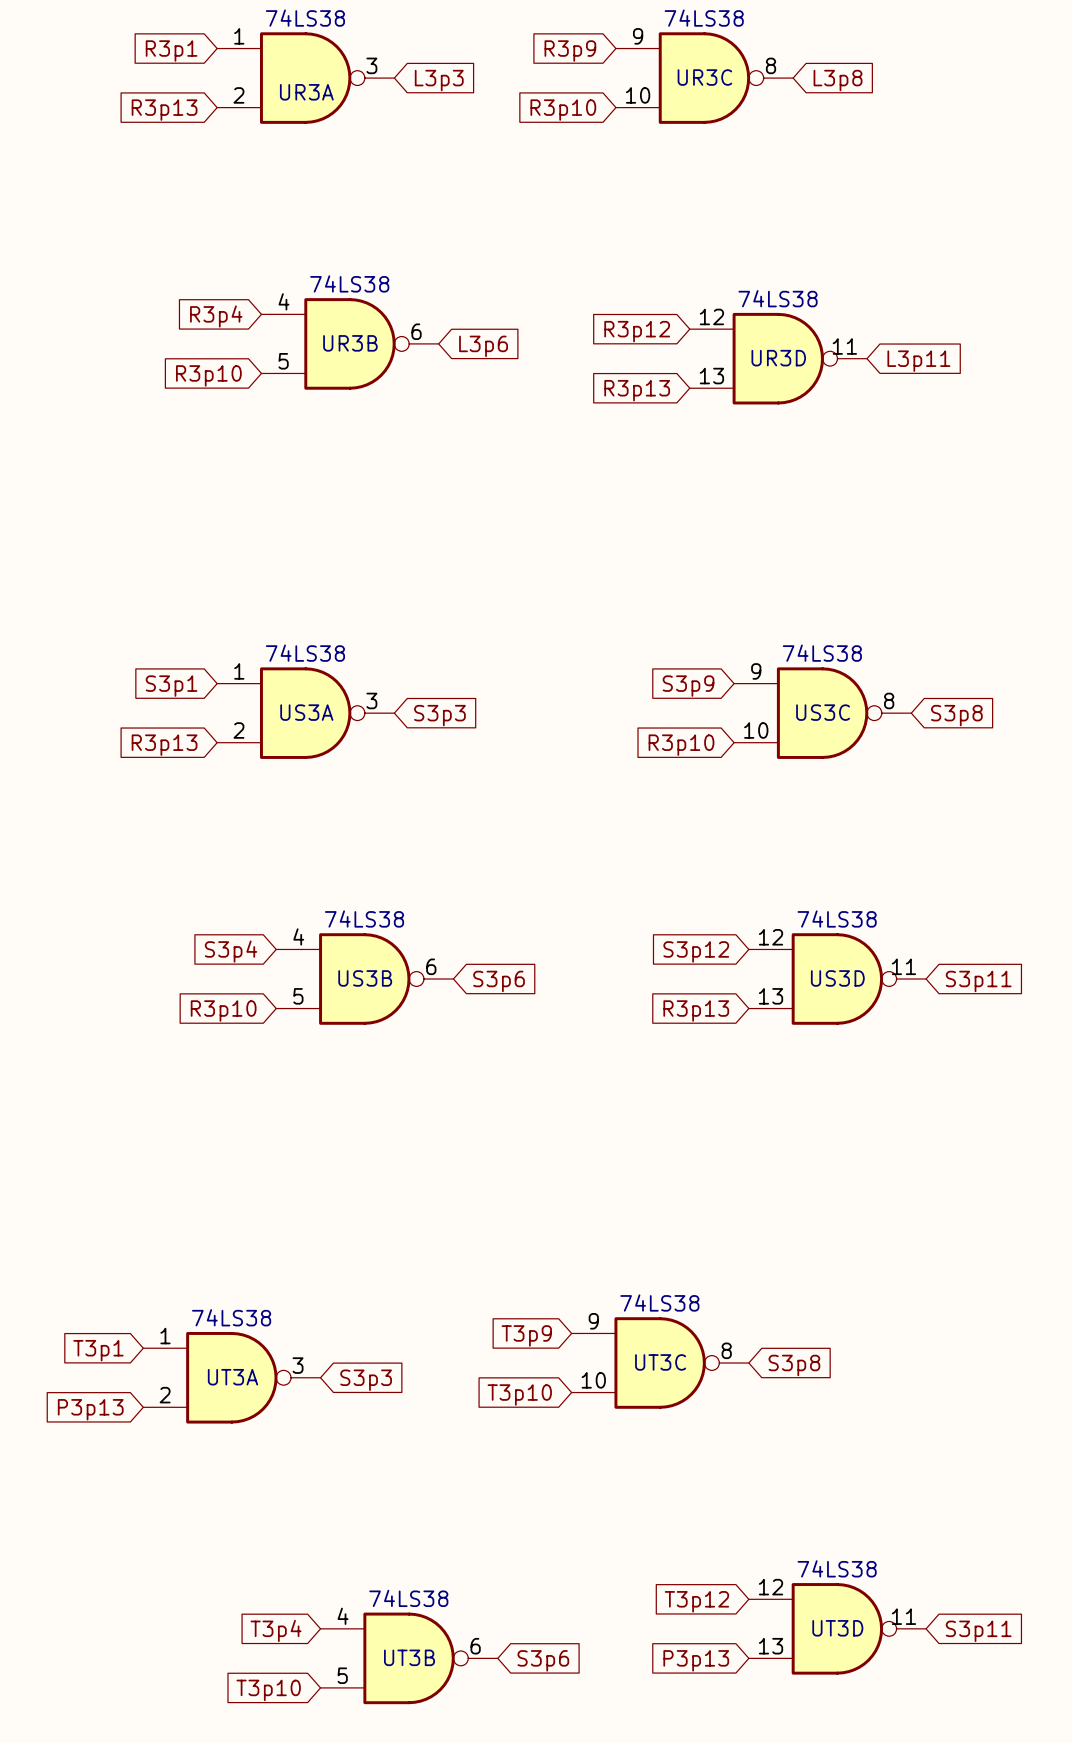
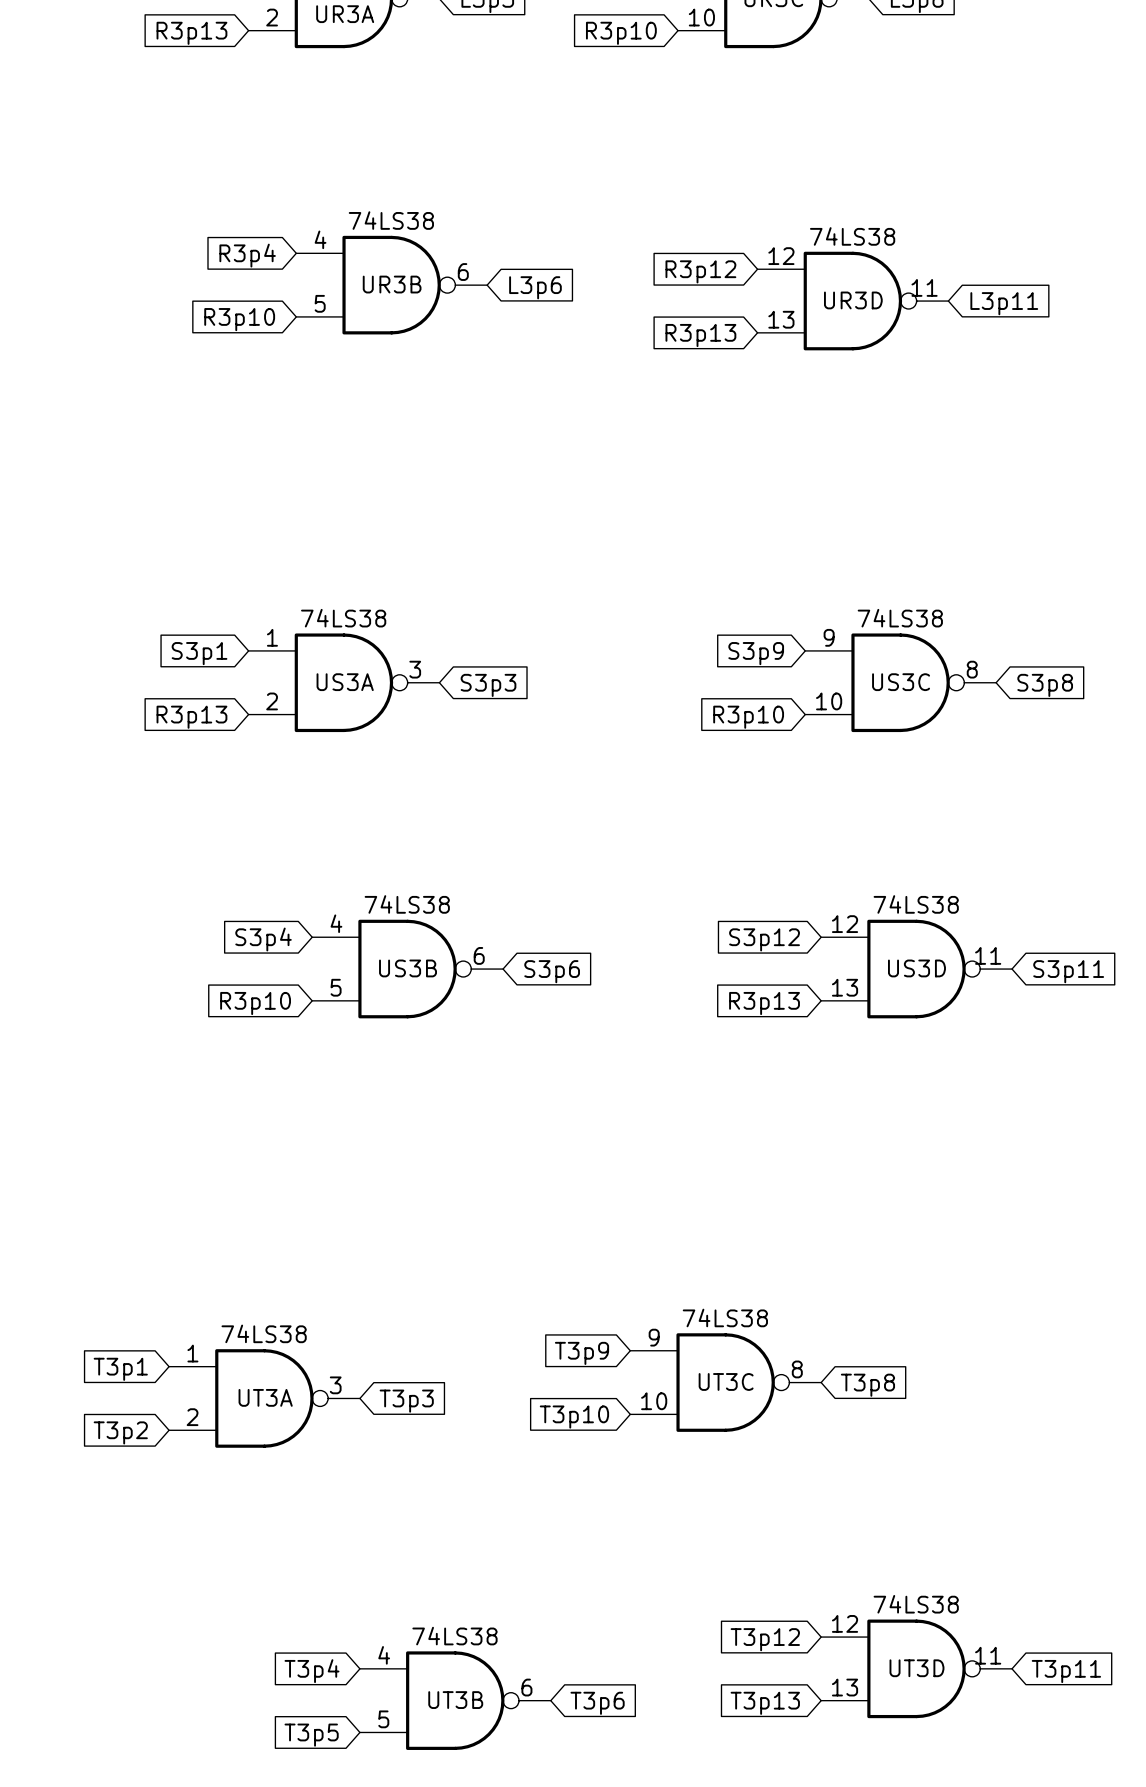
global label: S3p8 (794, 1365) -> T3p8 (867, 1385)
global label: S3p3 (366, 1380) -> T3p3 (406, 1401)
global label: P3p13 (90, 1409) -> T3p2 (120, 1432)
global label: S3p11 (978, 1631) -> T3p11 (1066, 1671)
global label: S3p6 (543, 1660) -> T3p6 (597, 1703)
global label: P3p13 (696, 1660) -> T3p13 (765, 1703)
global label: T3p10 (268, 1690) -> T3p5 (311, 1735)

